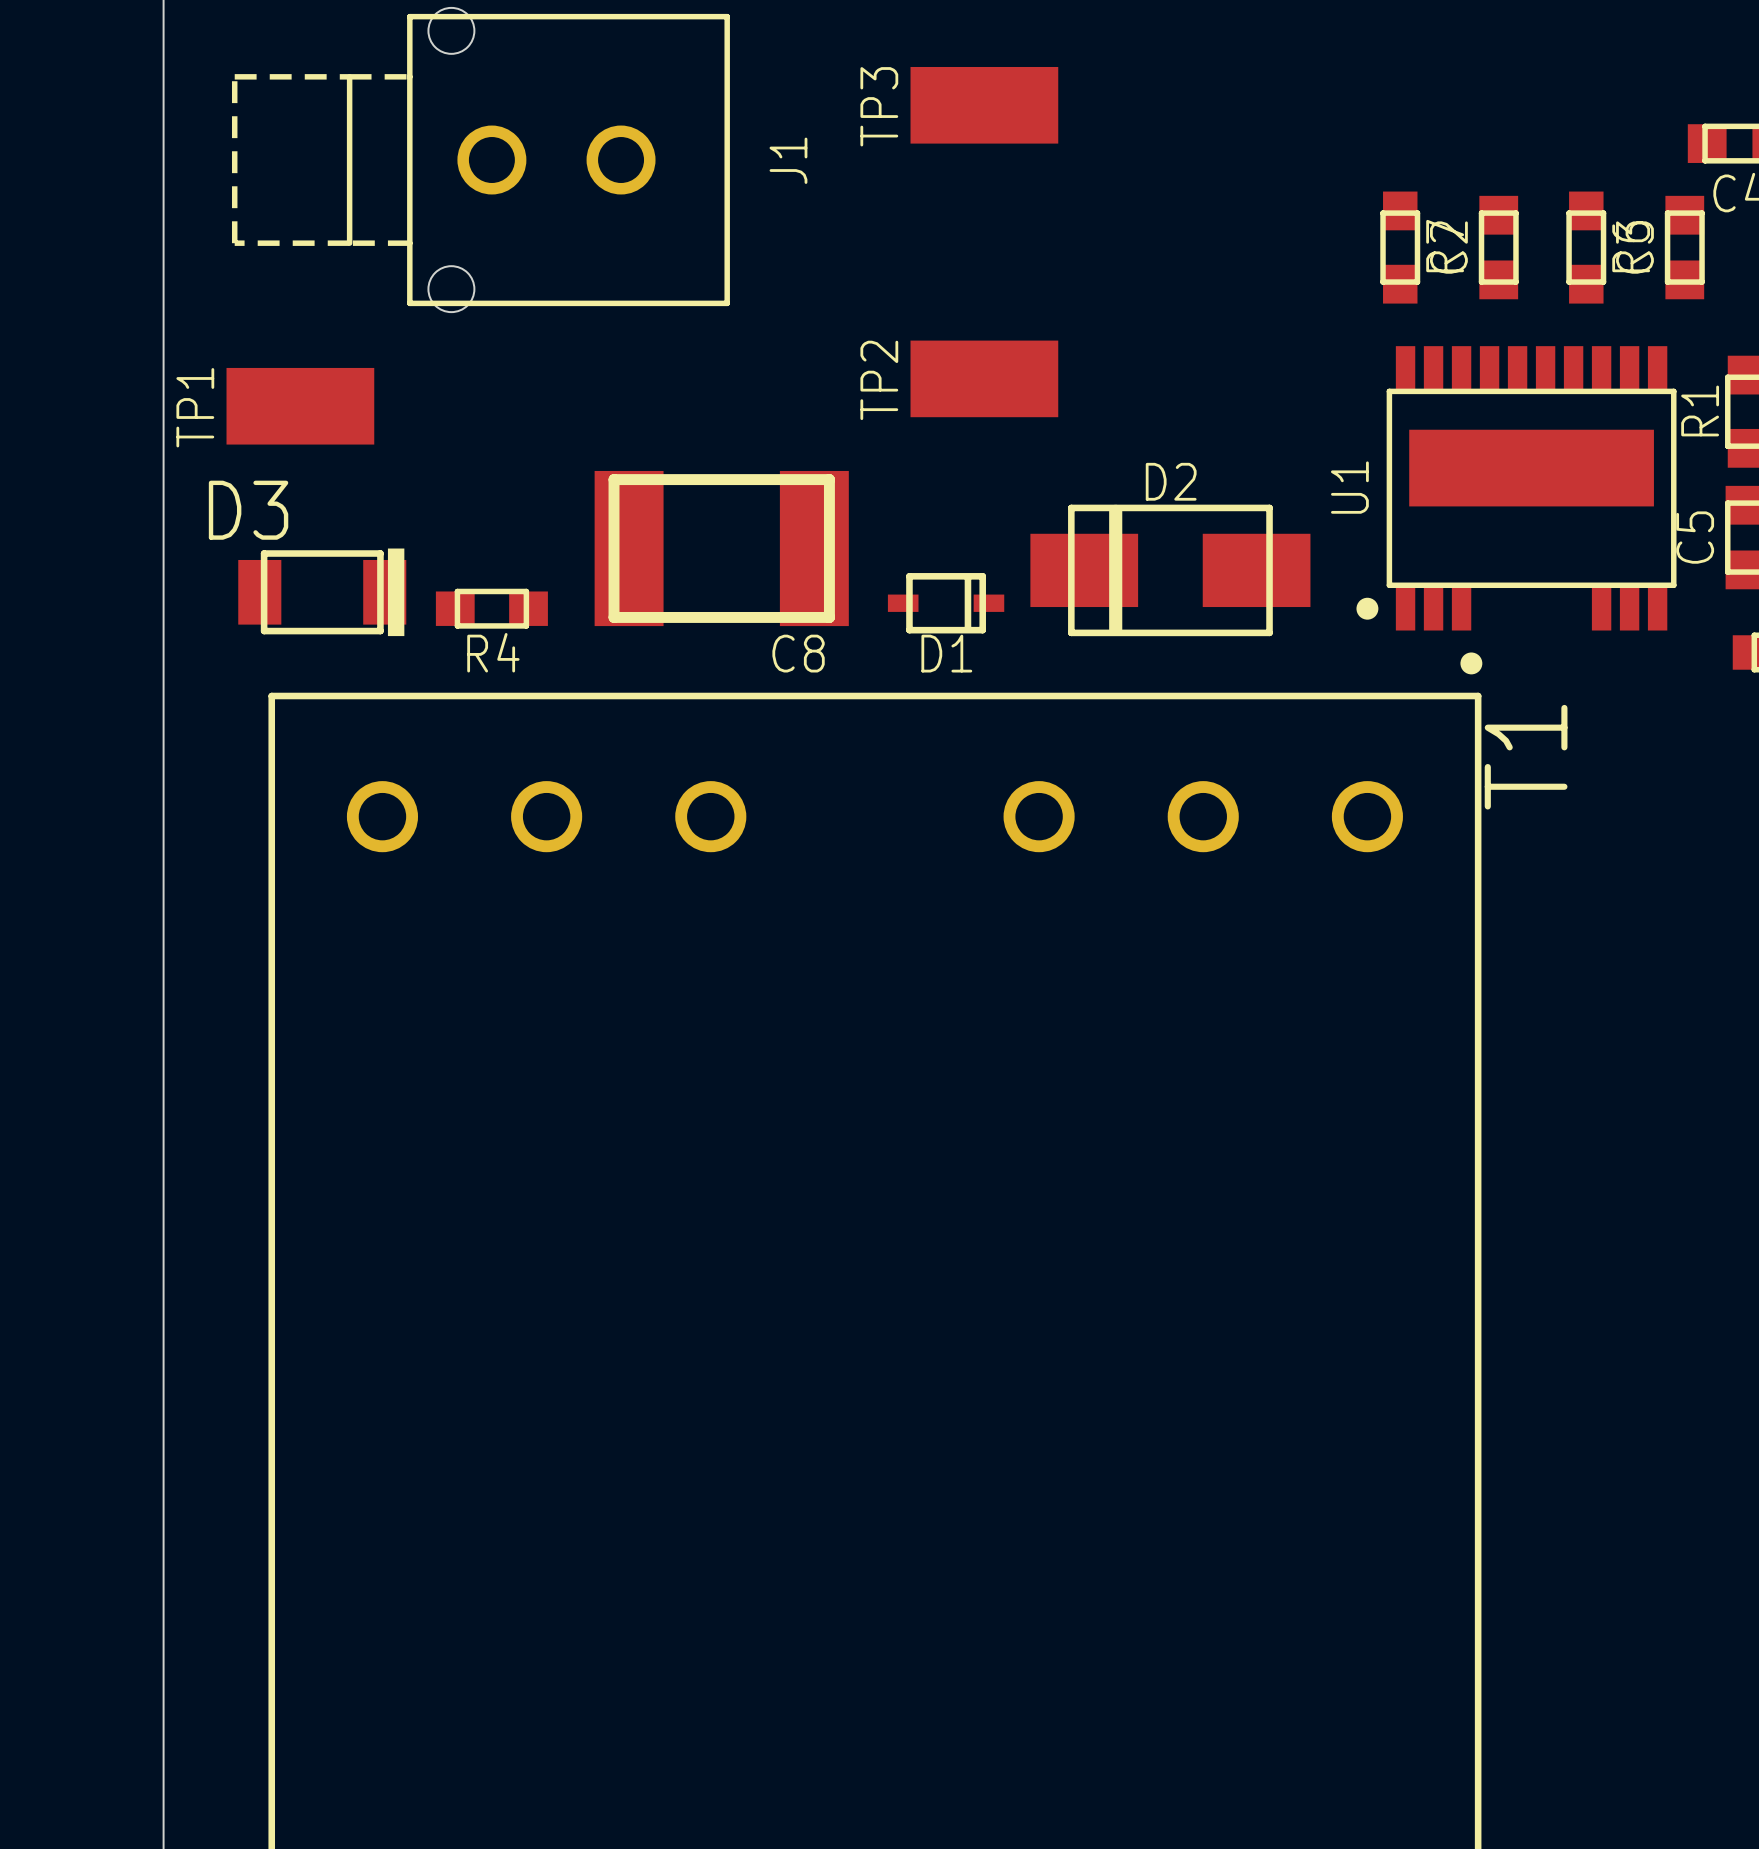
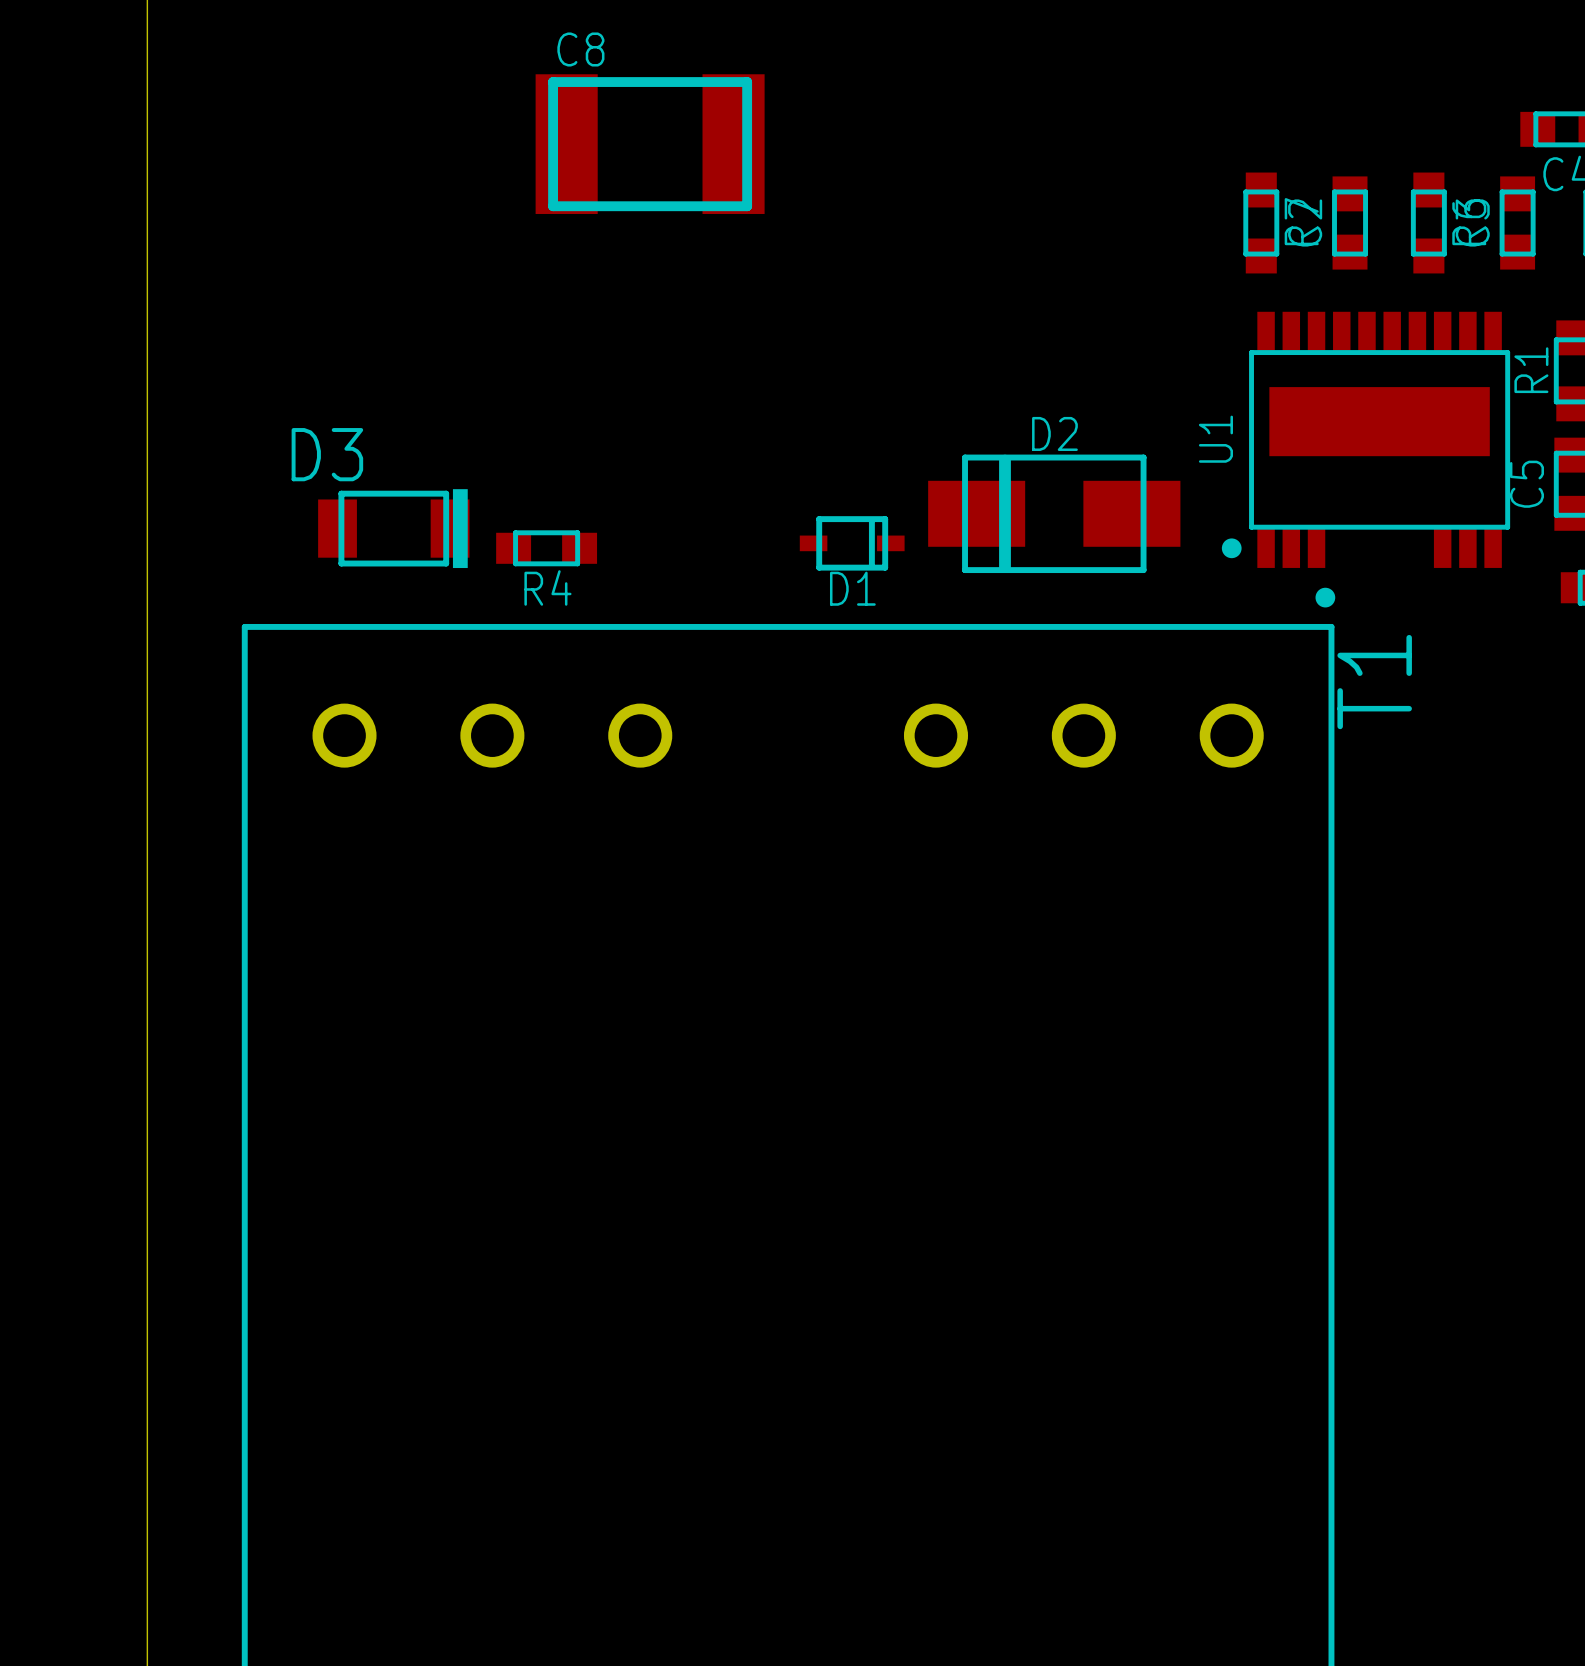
TP3: (984, 105) -> none
J1: (480, 160) -> none
TP2: (984, 378) -> none
TP1: (300, 406) -> none
C8 position: (721, 548) -> (650, 144)
D3 position: (322, 592) -> (393, 528)
R4 position: (491, 608) -> (546, 548)
C8 name position: C8 (798, 653) -> C8 (580, 49)

